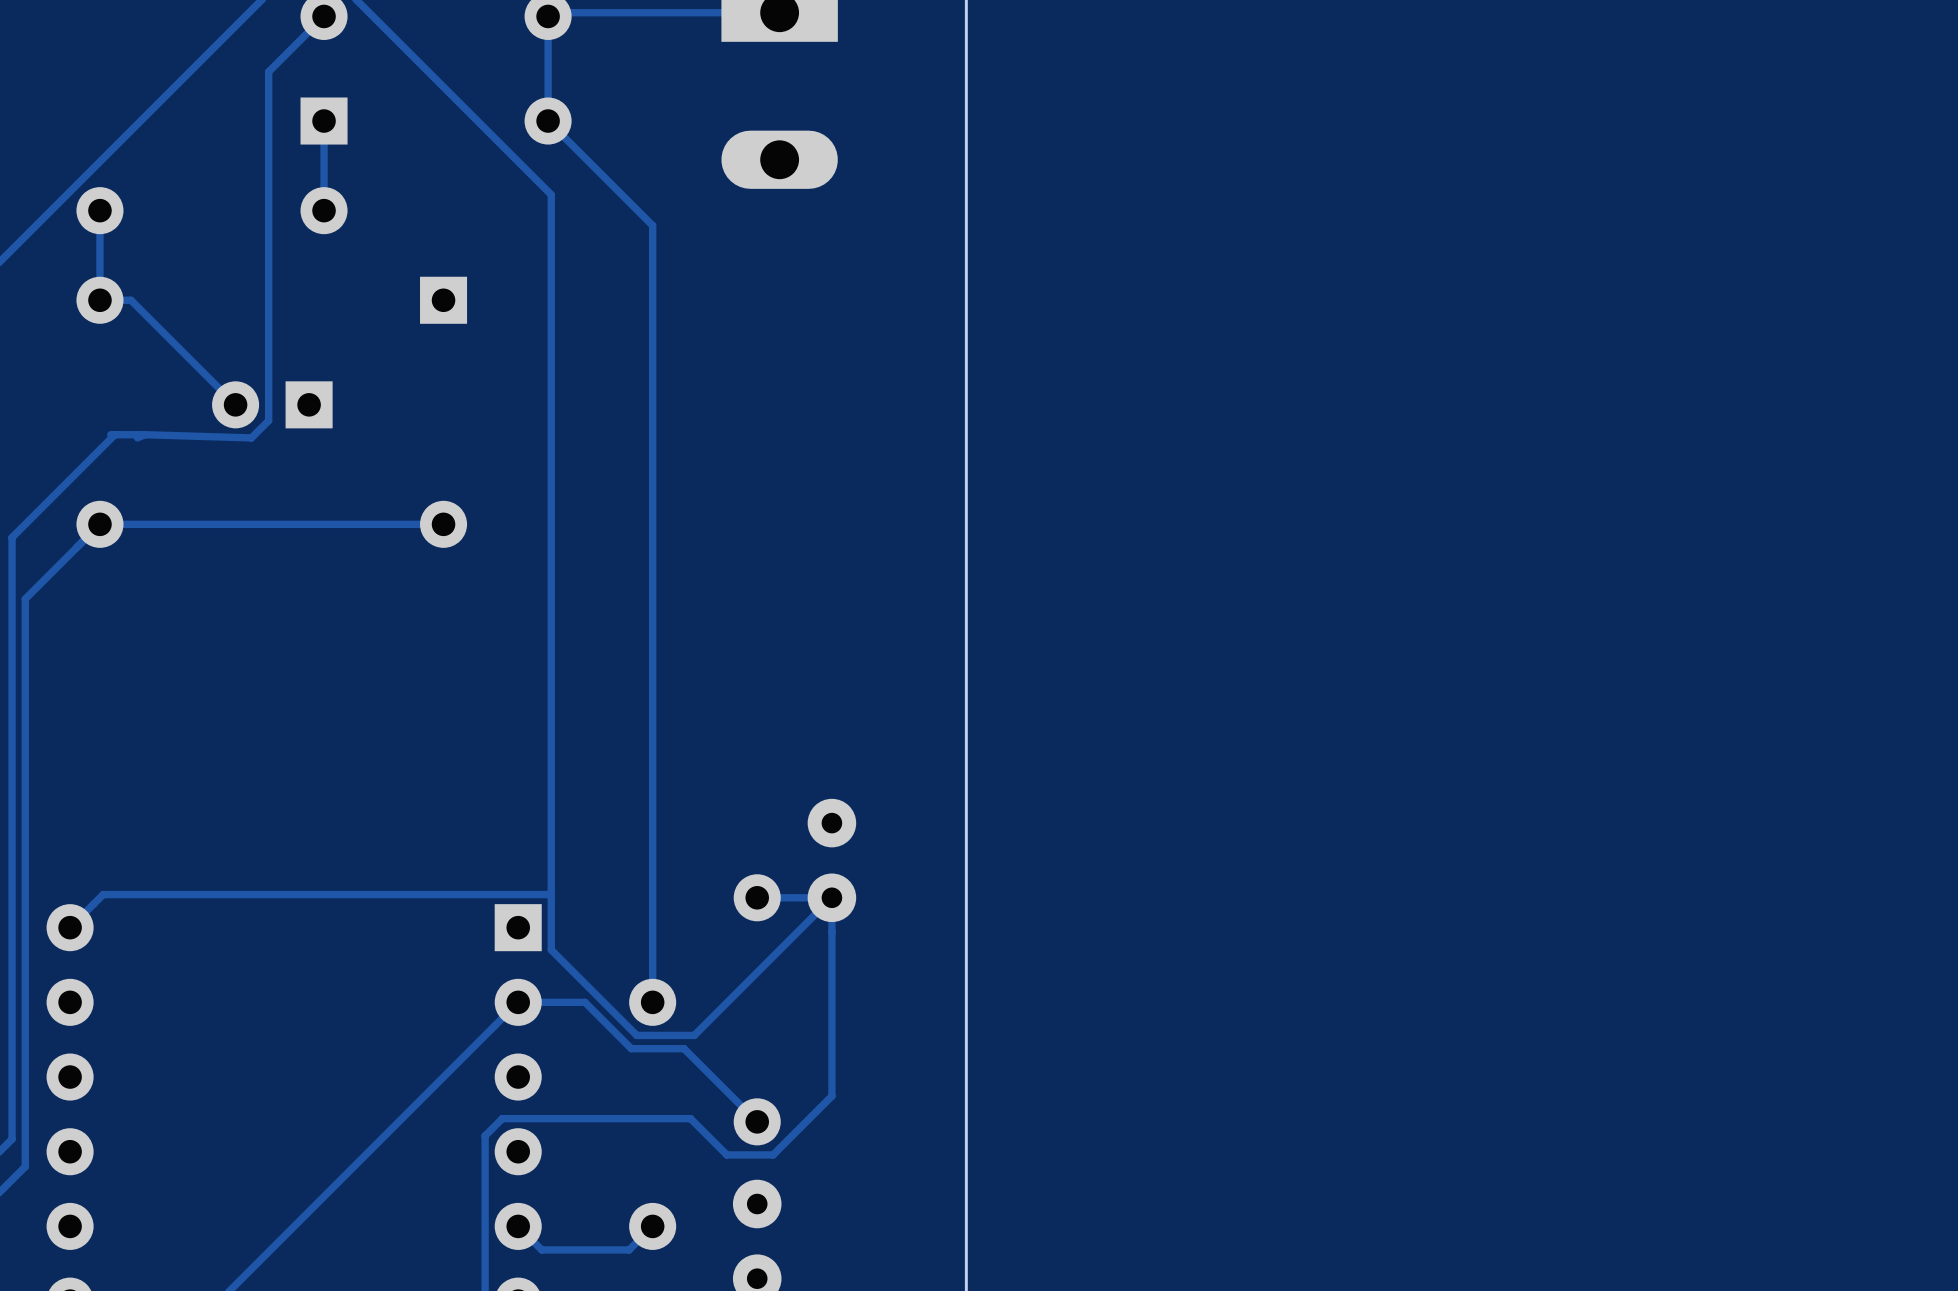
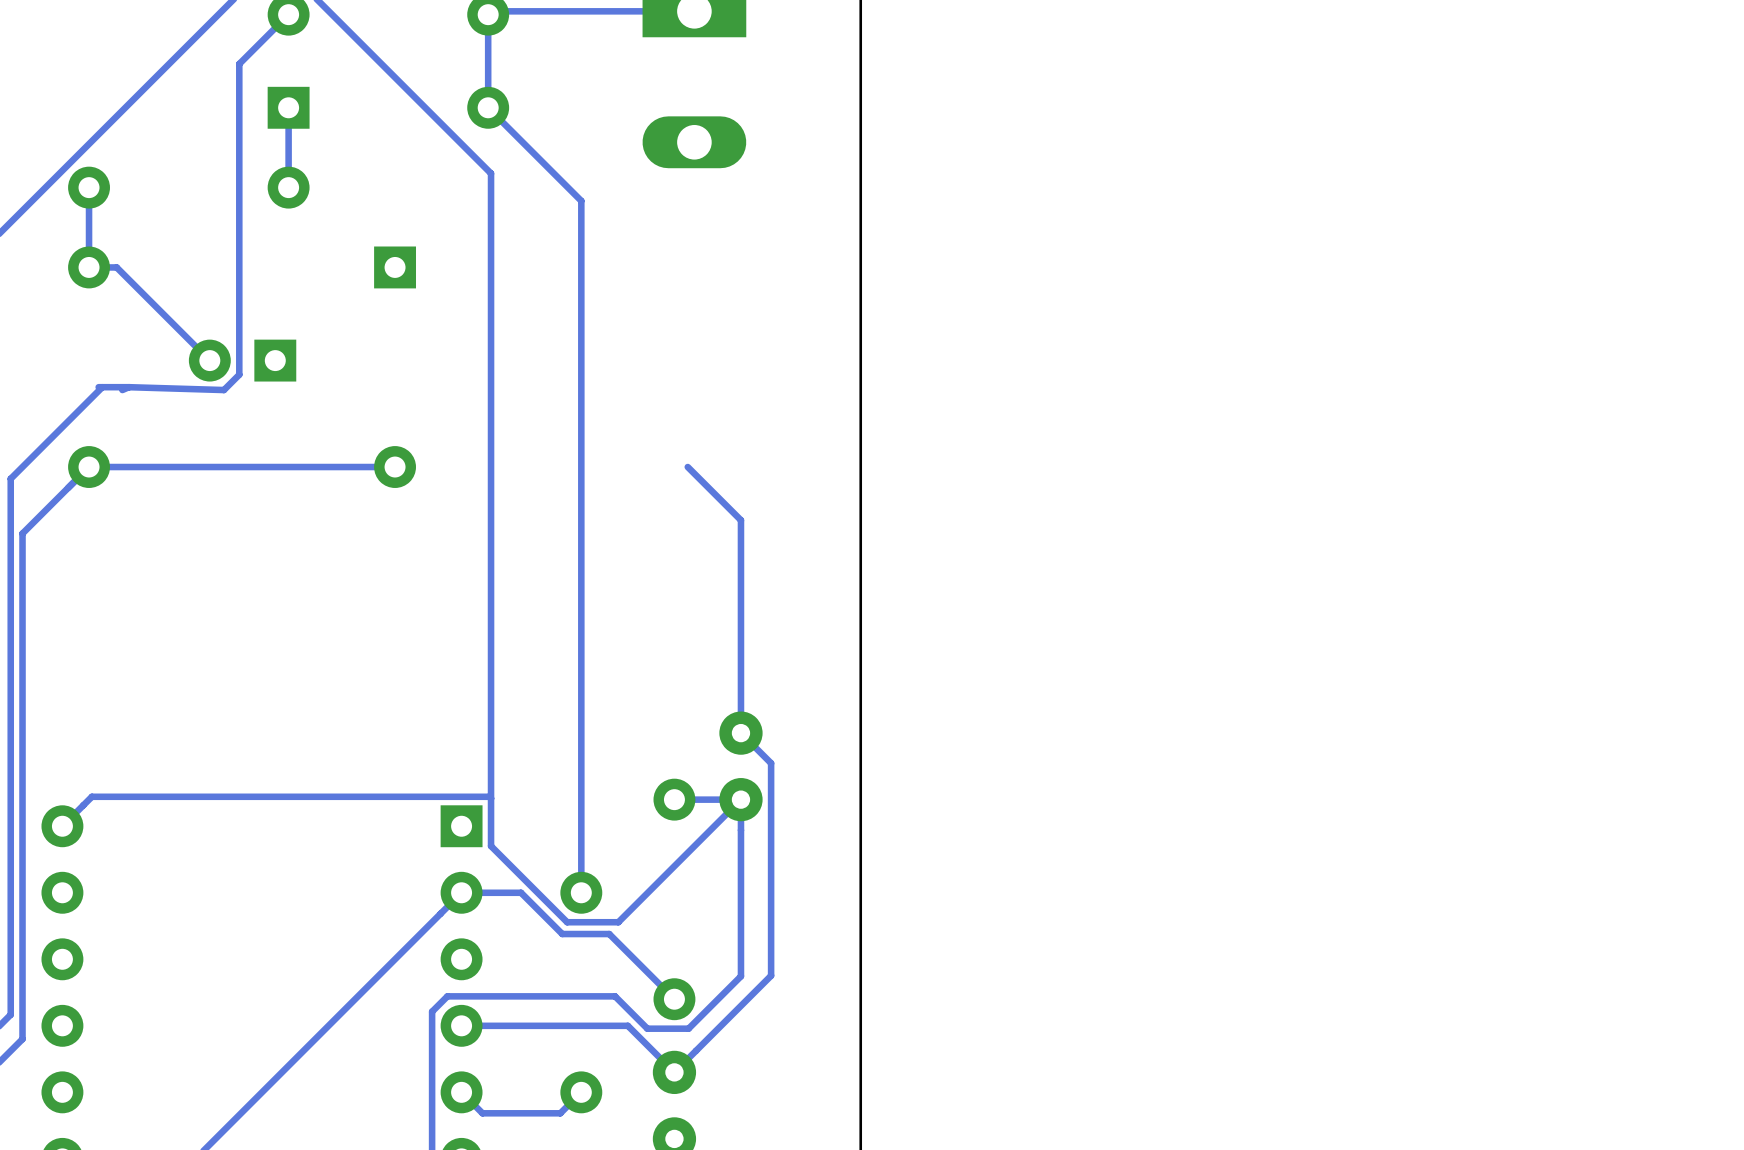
track: none -> (687, 467) (740, 520) (740, 733) (771, 763) (771, 975) (674, 1072) (627, 1025) (461, 1025)

